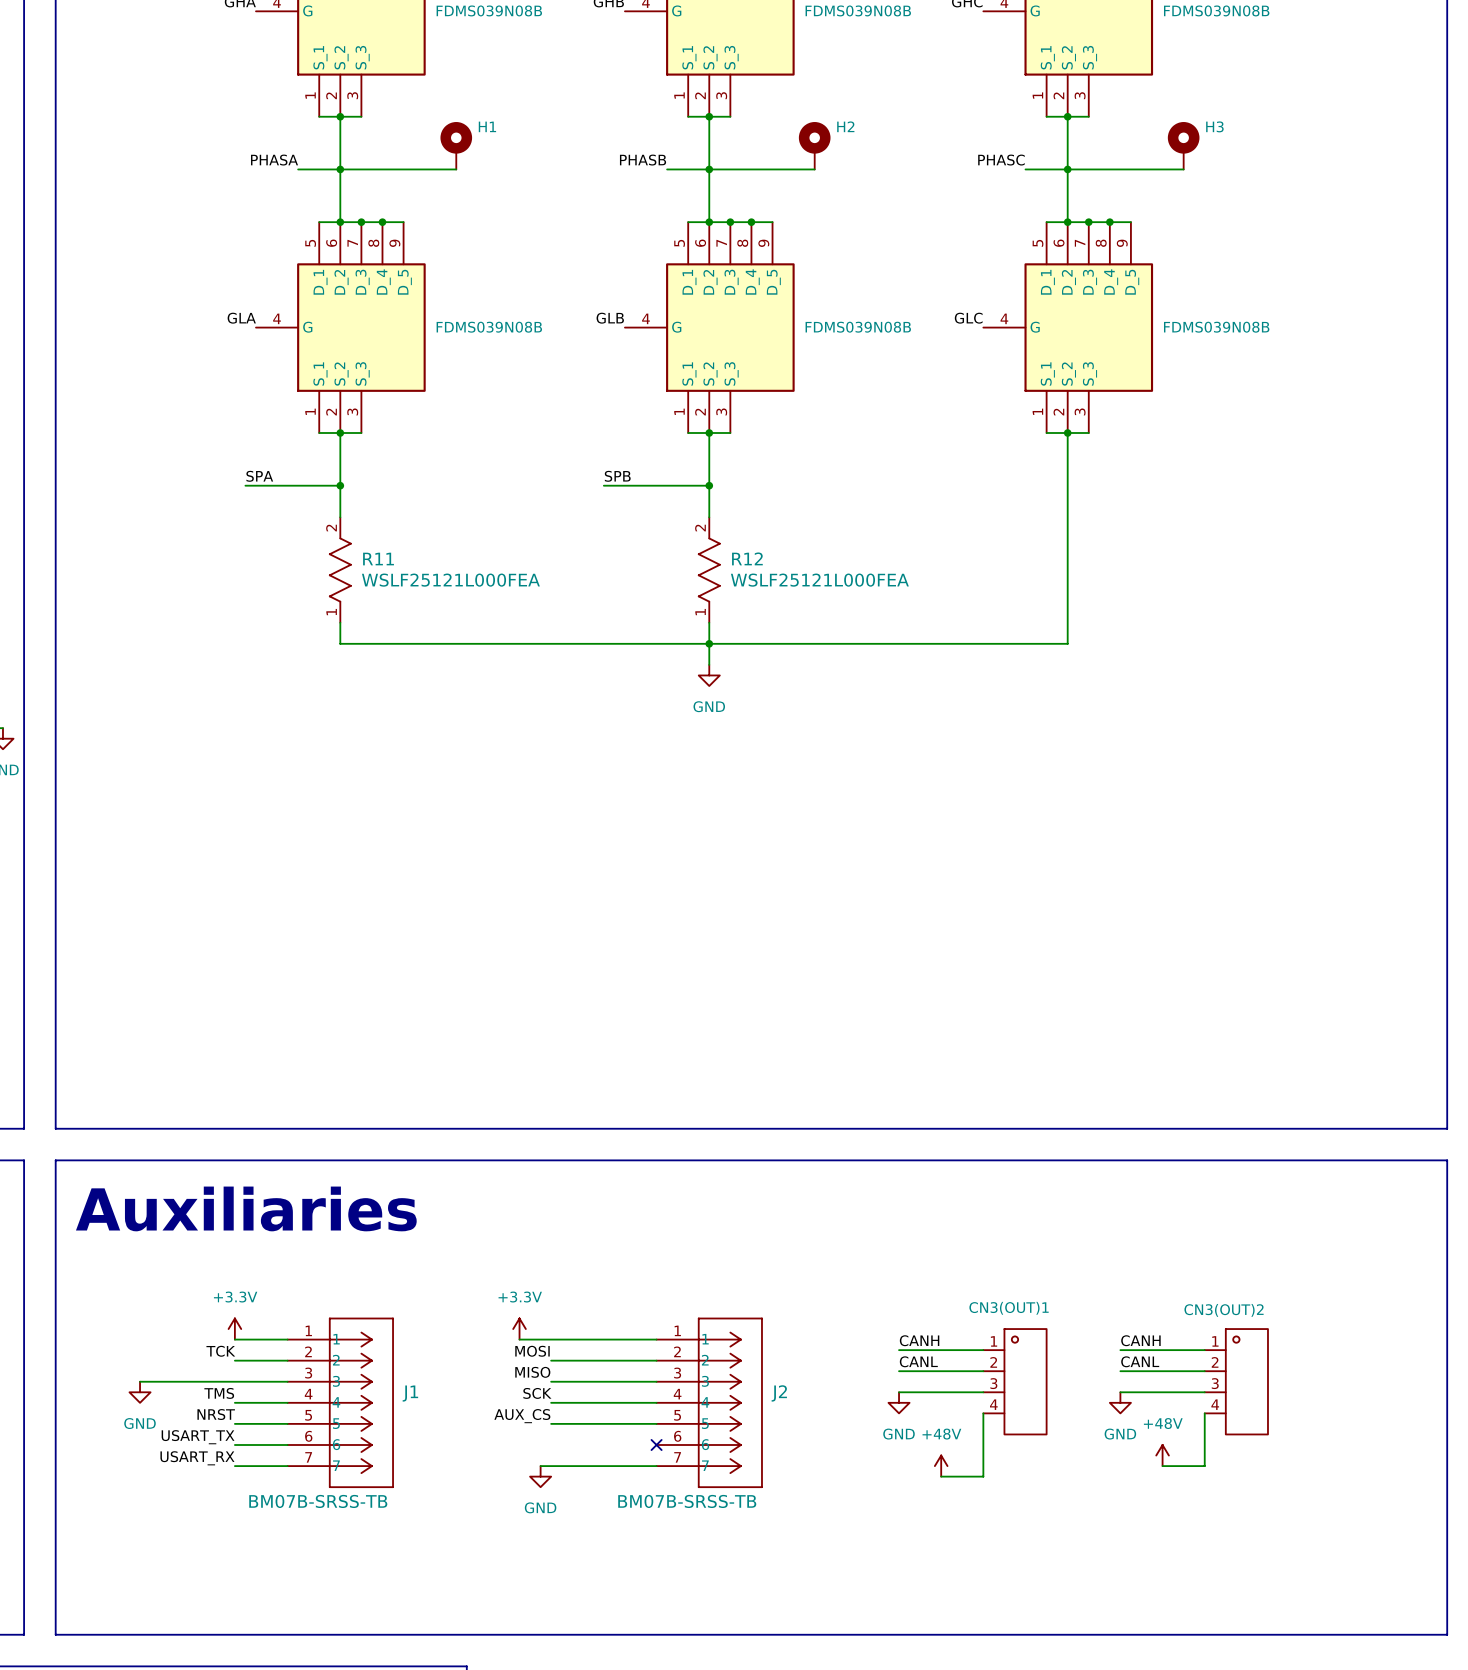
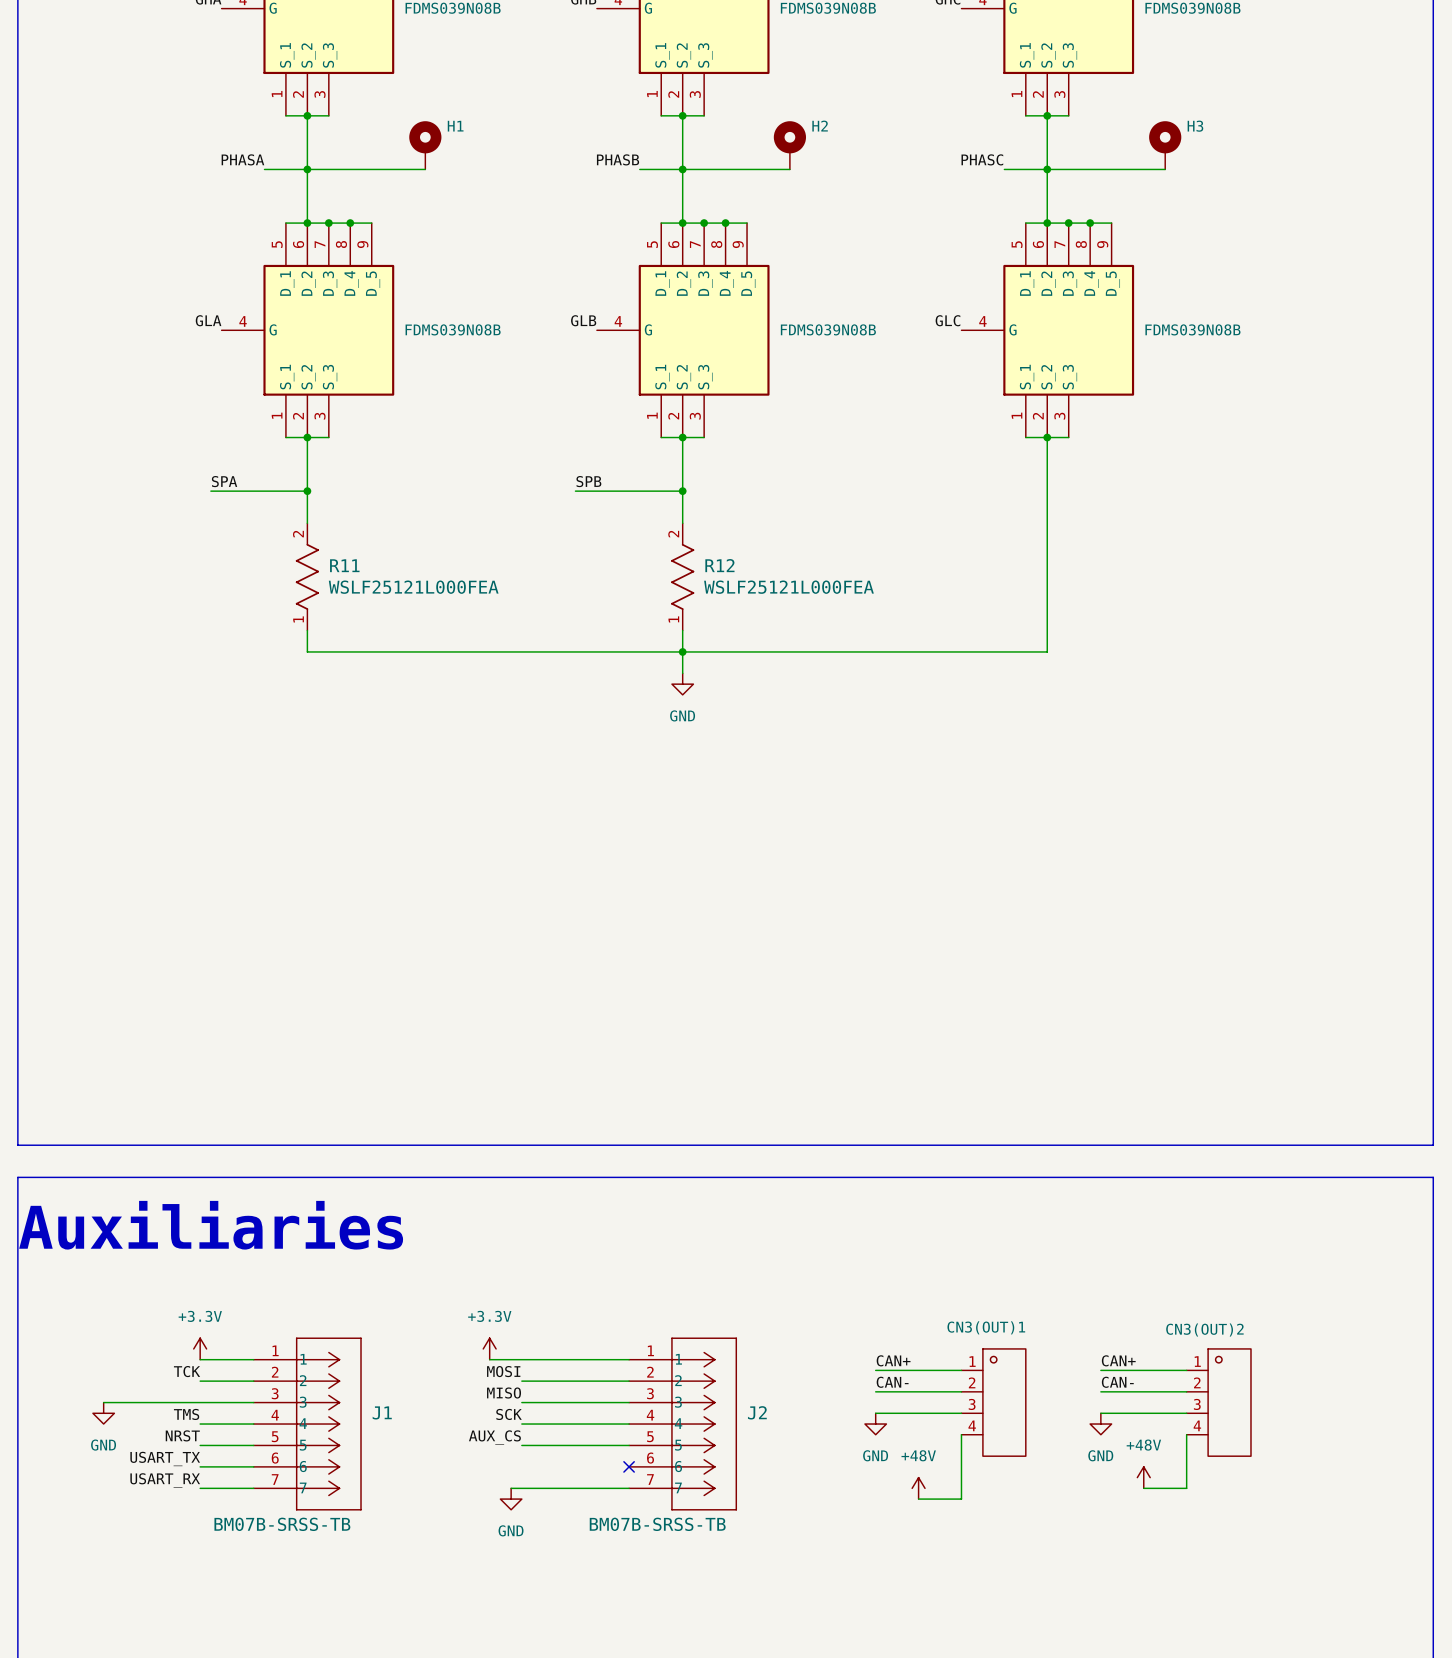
label: CANH (919, 1340) -> CAN+ (893, 1360)
label: CANH (1140, 1340) -> CAN+ (1118, 1360)
label: CANL (918, 1361) -> CAN- (892, 1382)
label: CANL (1140, 1361) -> CAN- (1117, 1382)

